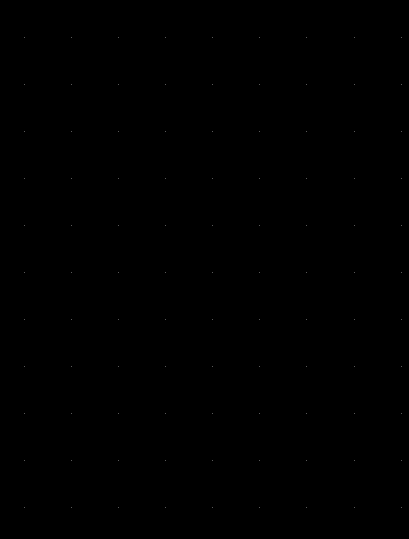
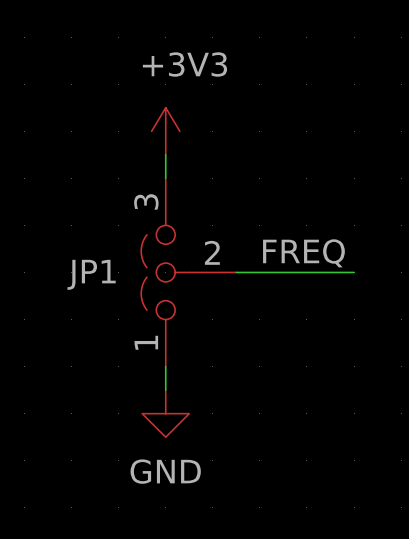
power symbol: none -> +3V3 (165, 131)
wire: none -> (165, 154) (165, 178)
label: none -> FREQ (303, 253)
JP1: none -> (188, 272)
wire: none -> (236, 272) (354, 272)
wire: none -> (165, 366) (165, 390)
power symbol: none -> GND (165, 413)

